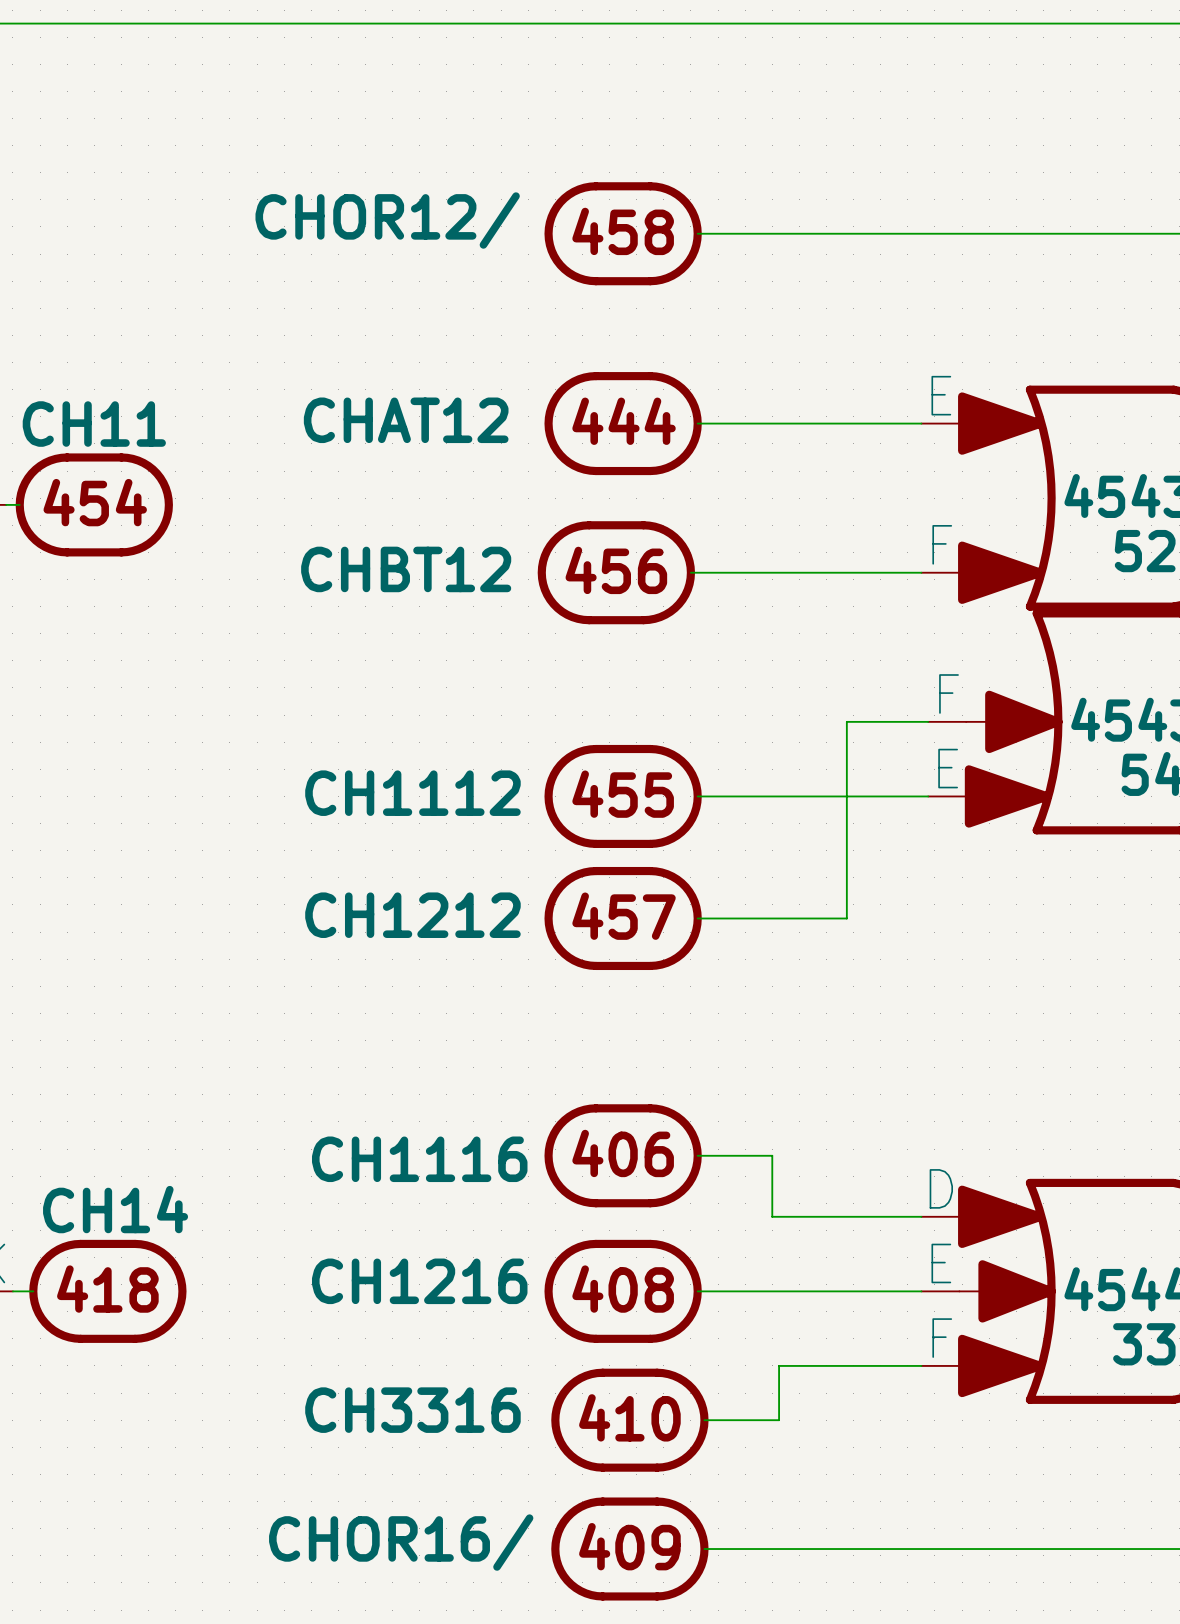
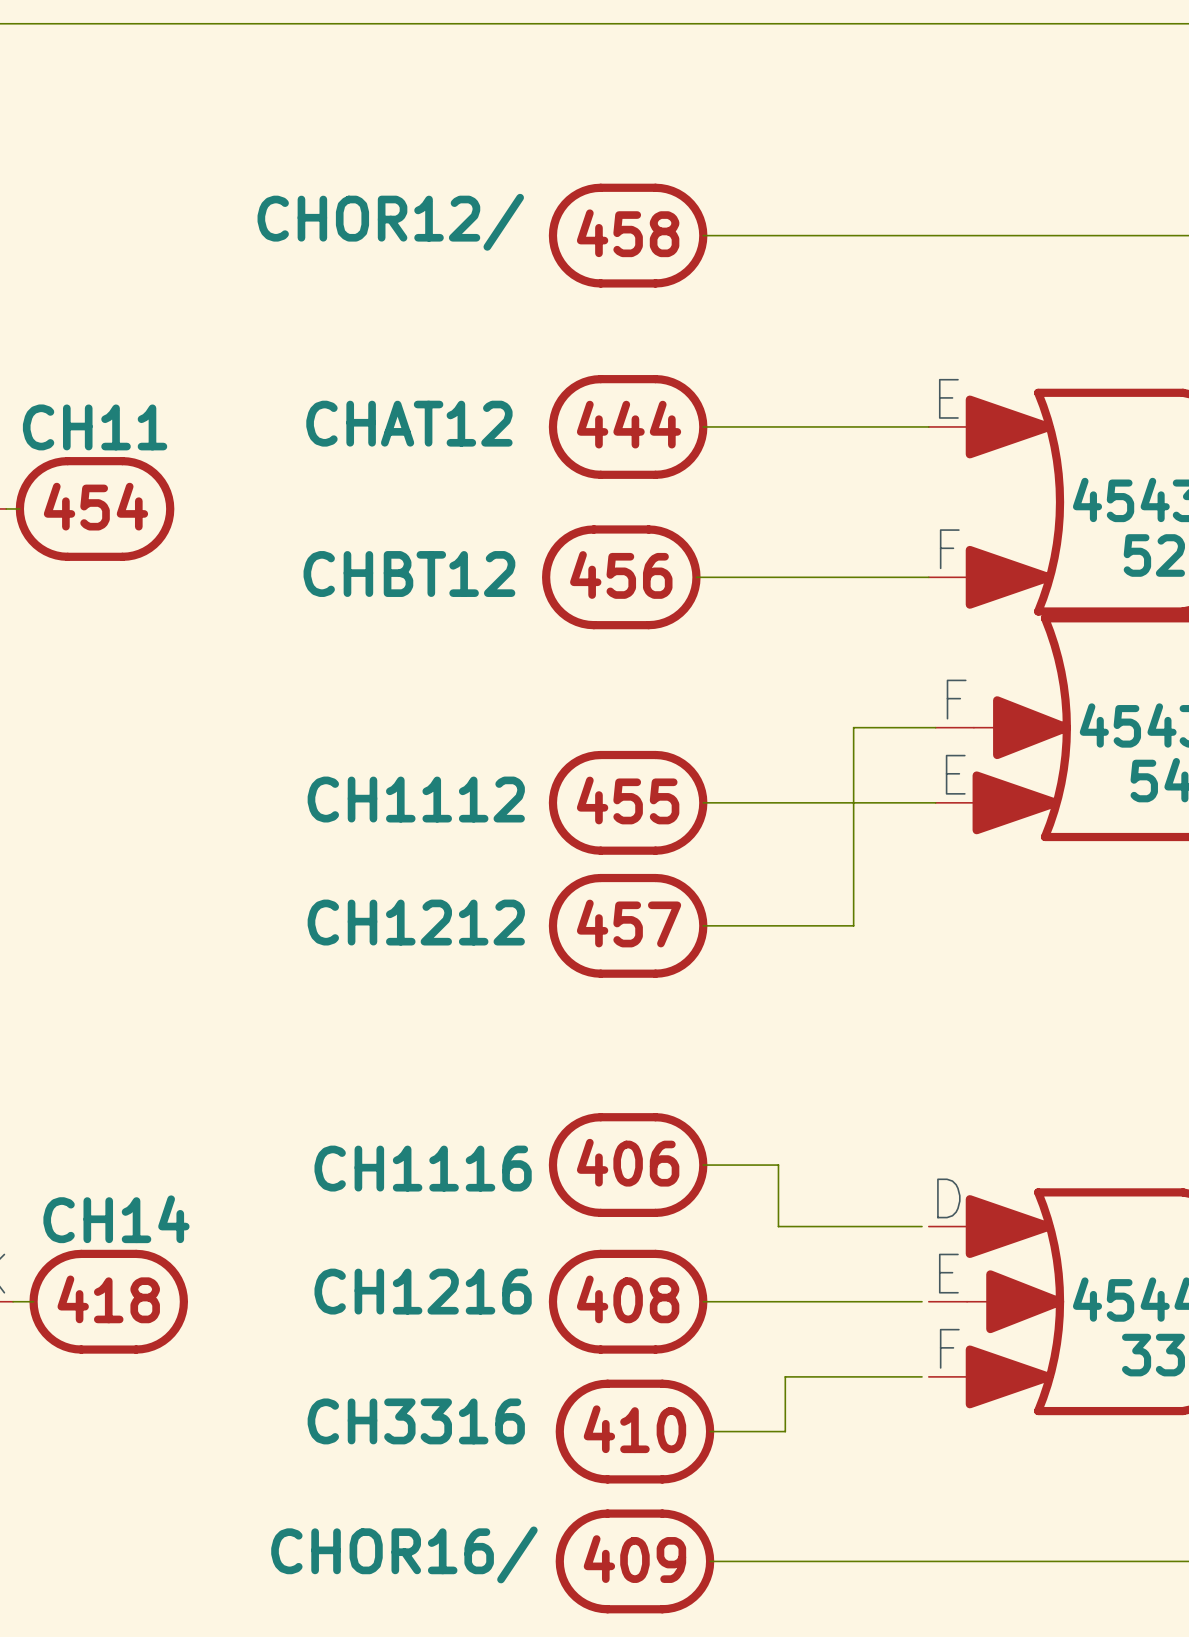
wire: (914, 1216) (921, 1216) -> none
wire: (914, 1291) (921, 1291) -> none
wire: (914, 1365) (921, 1365) -> none

